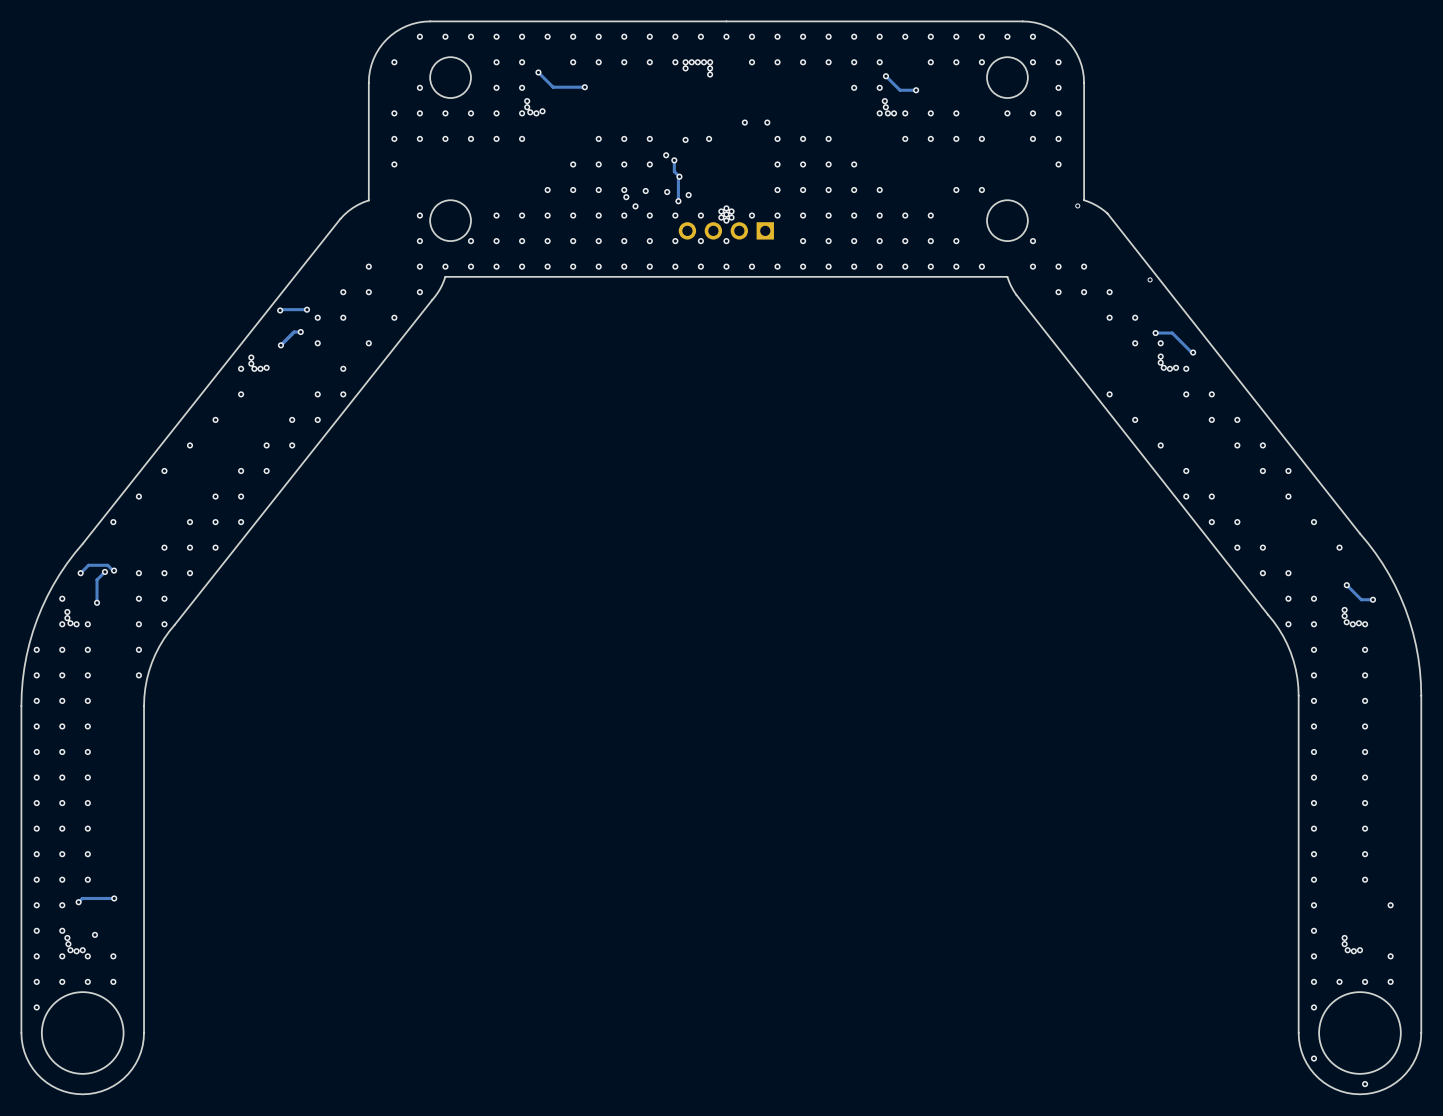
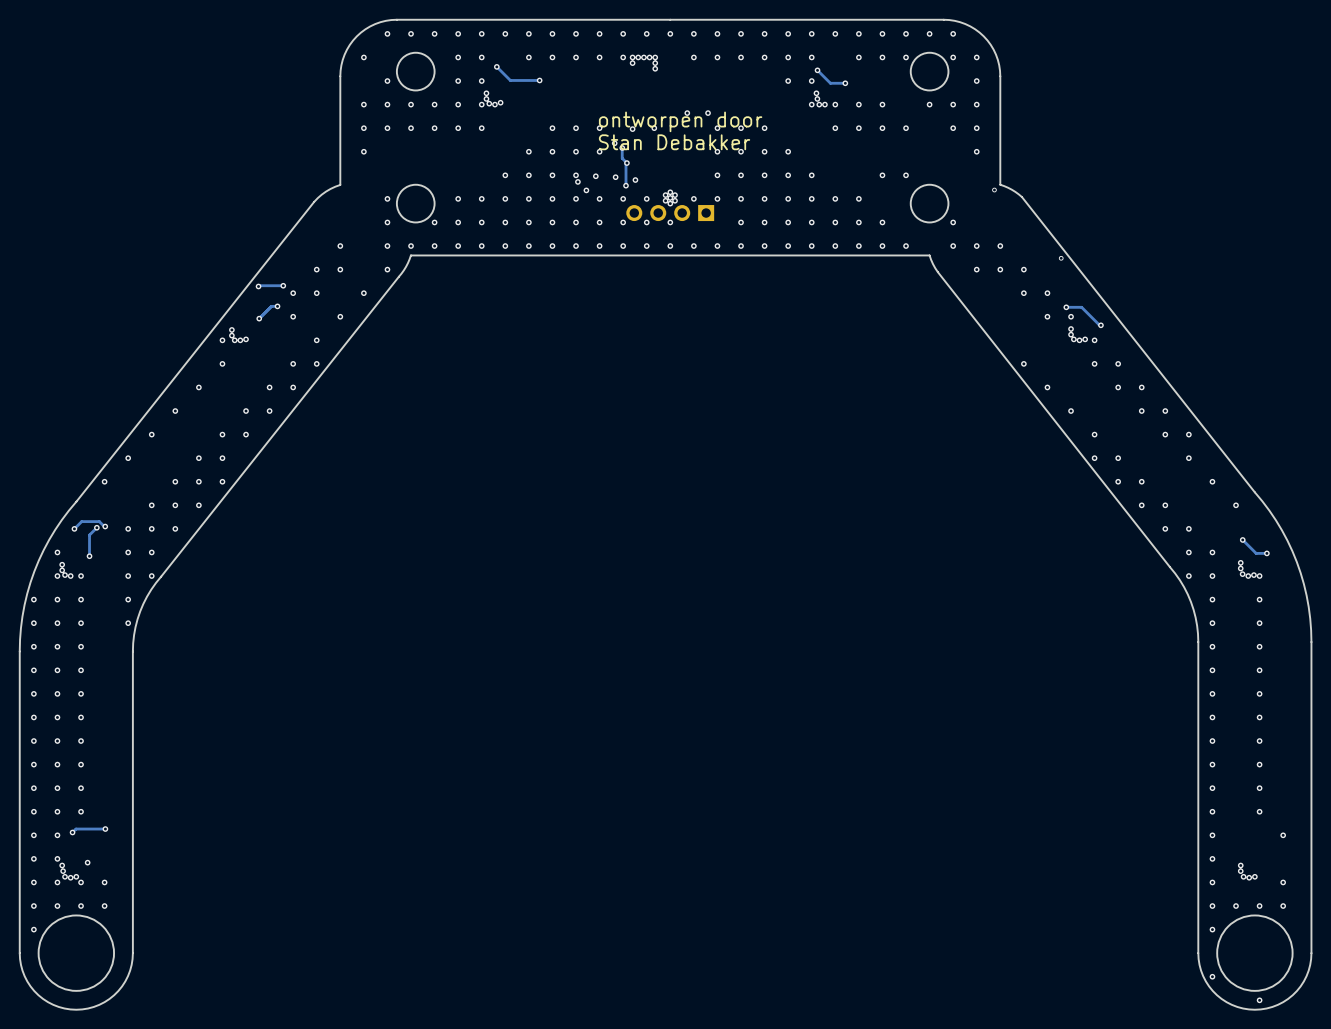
text: none -> ontworpen door (680, 121)
text: none -> Stan Debakker (674, 142)

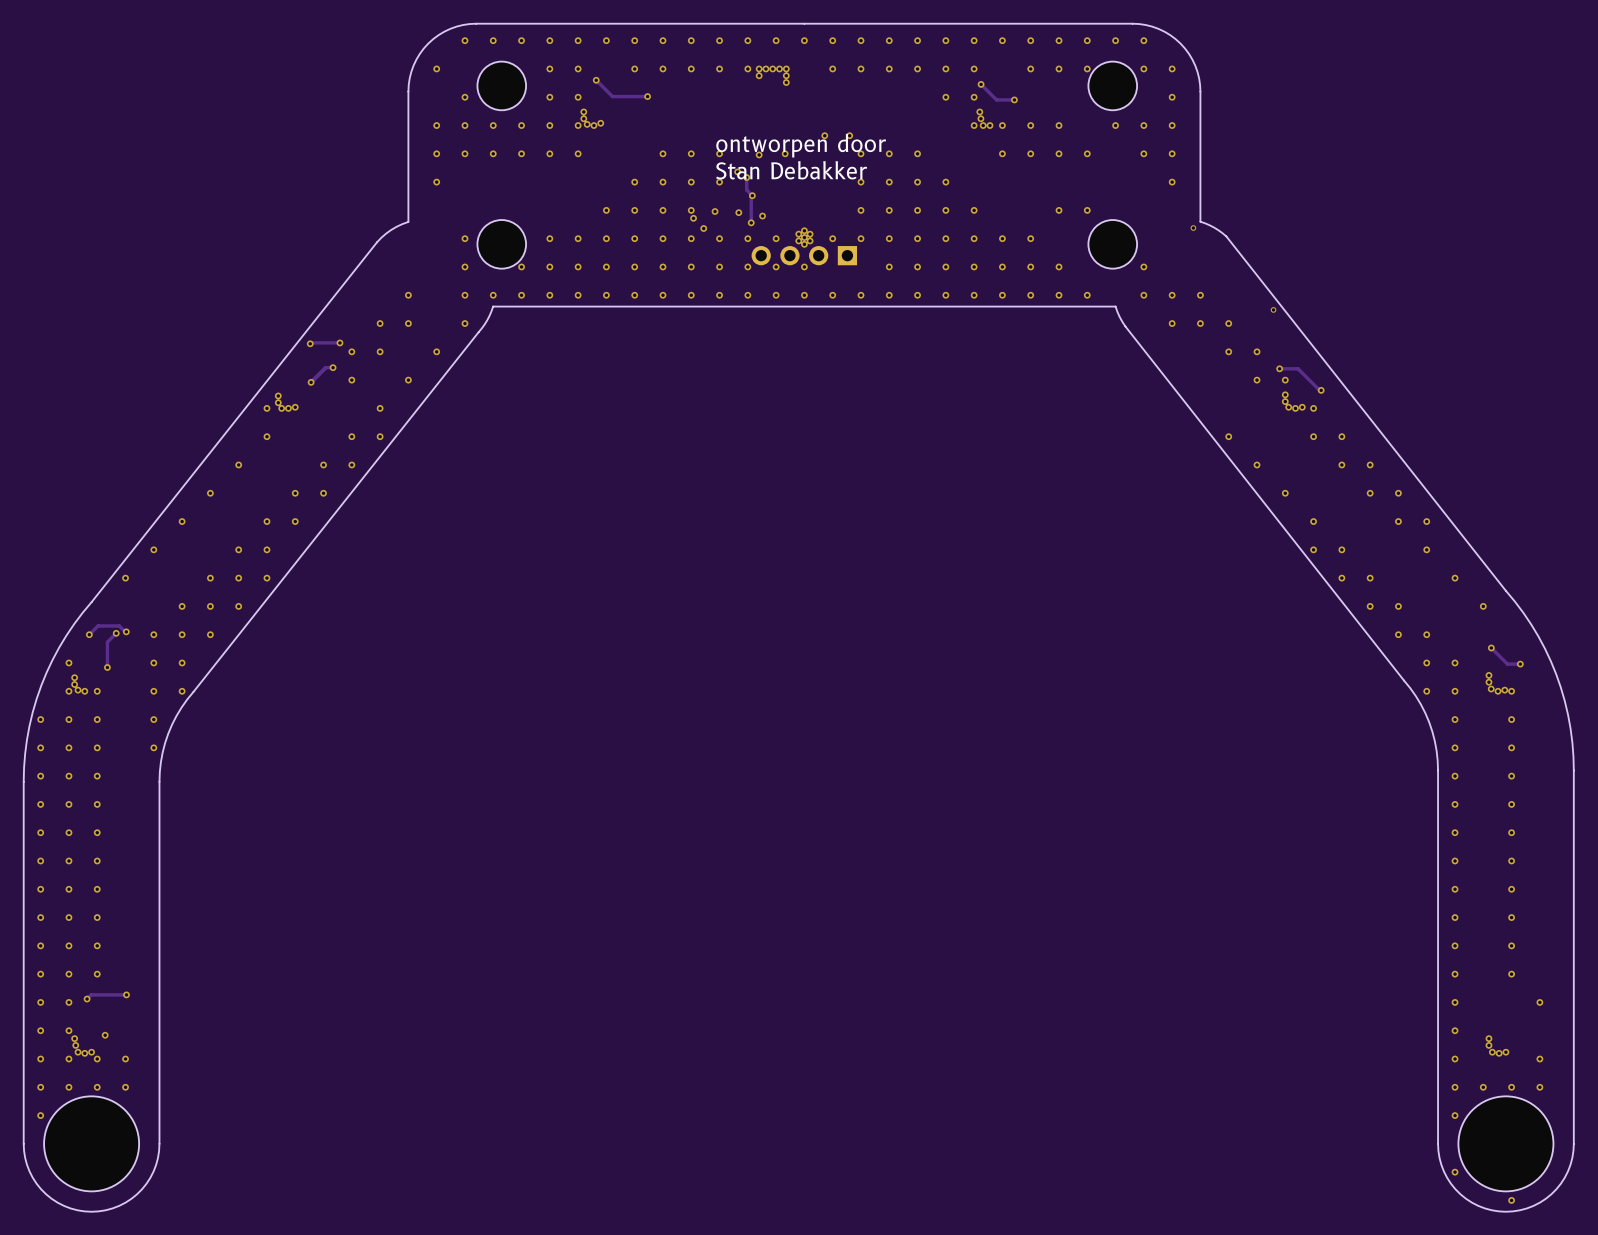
round board edge: [396, 52, 435, 91] -> none
round board edge: [910, 52, 949, 91] -> none
part: none -> (501, 85)
part: none -> (1112, 85)
round board edge: [396, 184, 435, 223] -> none
round board edge: [910, 184, 949, 223] -> none
part: none -> (501, 244)
part: none -> (1112, 244)
round board edge: [38, 915, 115, 992] -> none
round board edge: [1216, 915, 1293, 992] -> none
part: none -> (91, 1143)
part: none -> (1505, 1143)

